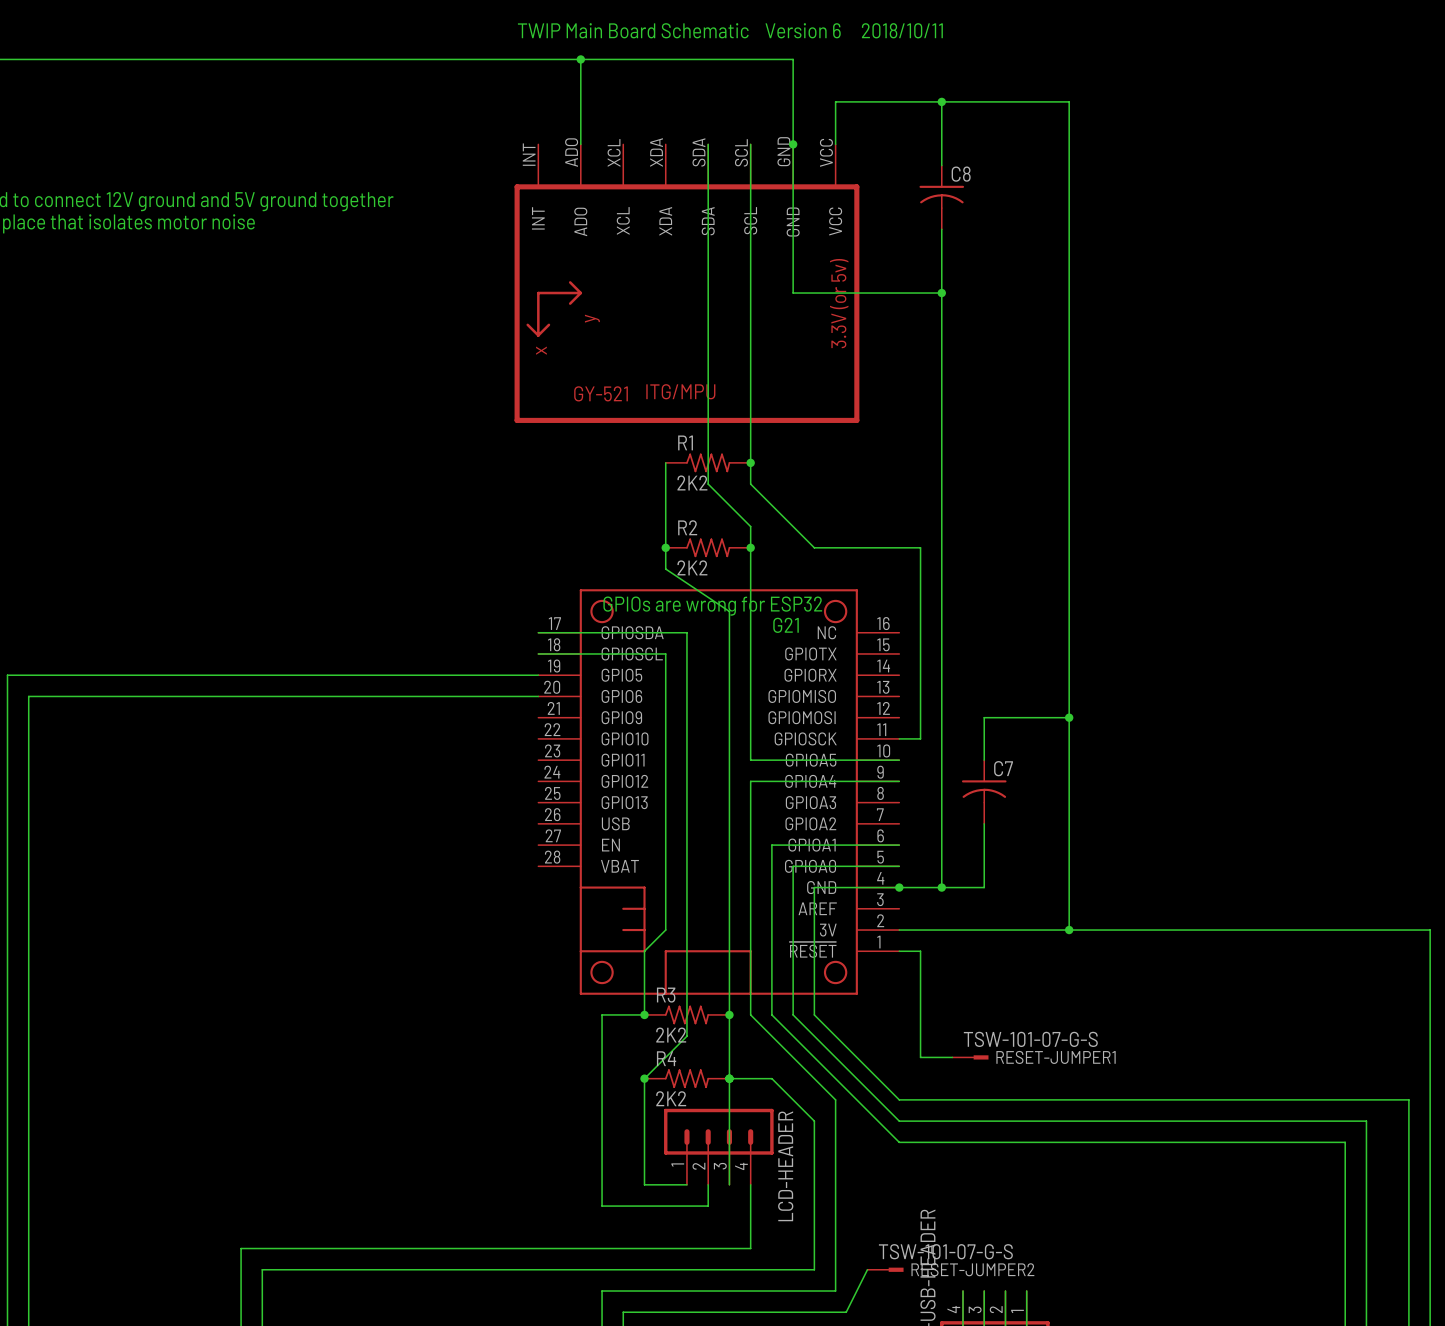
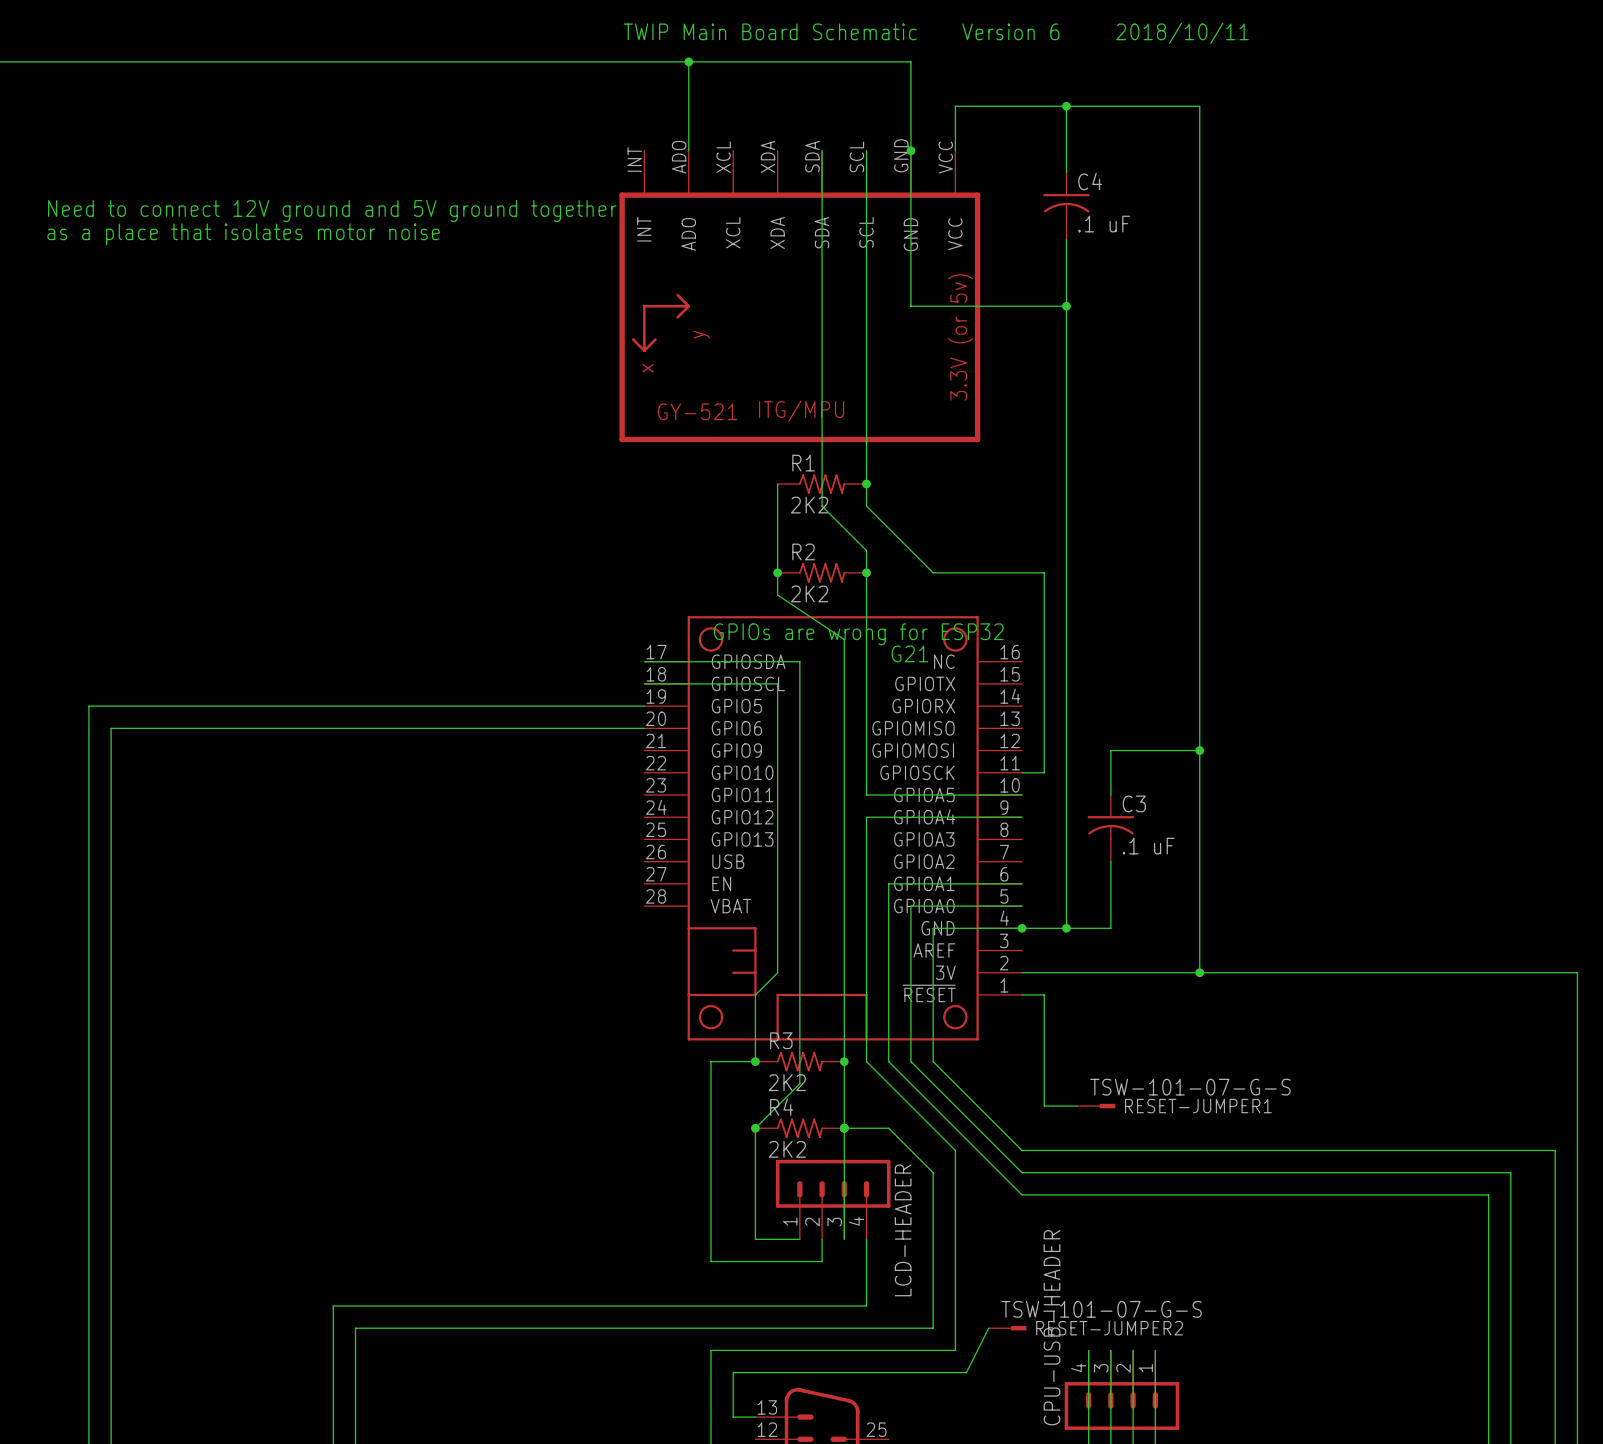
C8 name: C8 (961, 174) -> C4 (1090, 181)
C8 value: none -> .1 uF (1104, 224)
C7 name: C7 (1003, 768) -> C3 (1134, 803)
C7 value: none -> .1 uF (1148, 846)

